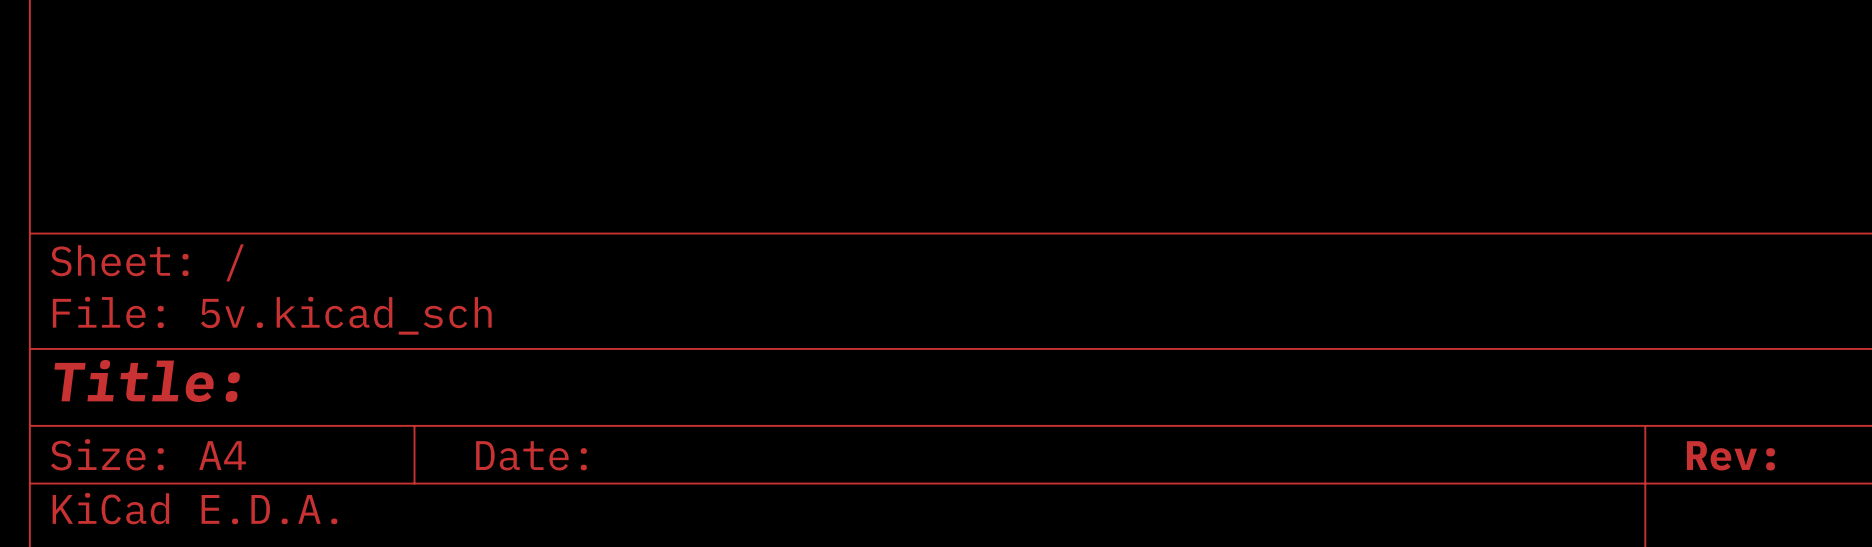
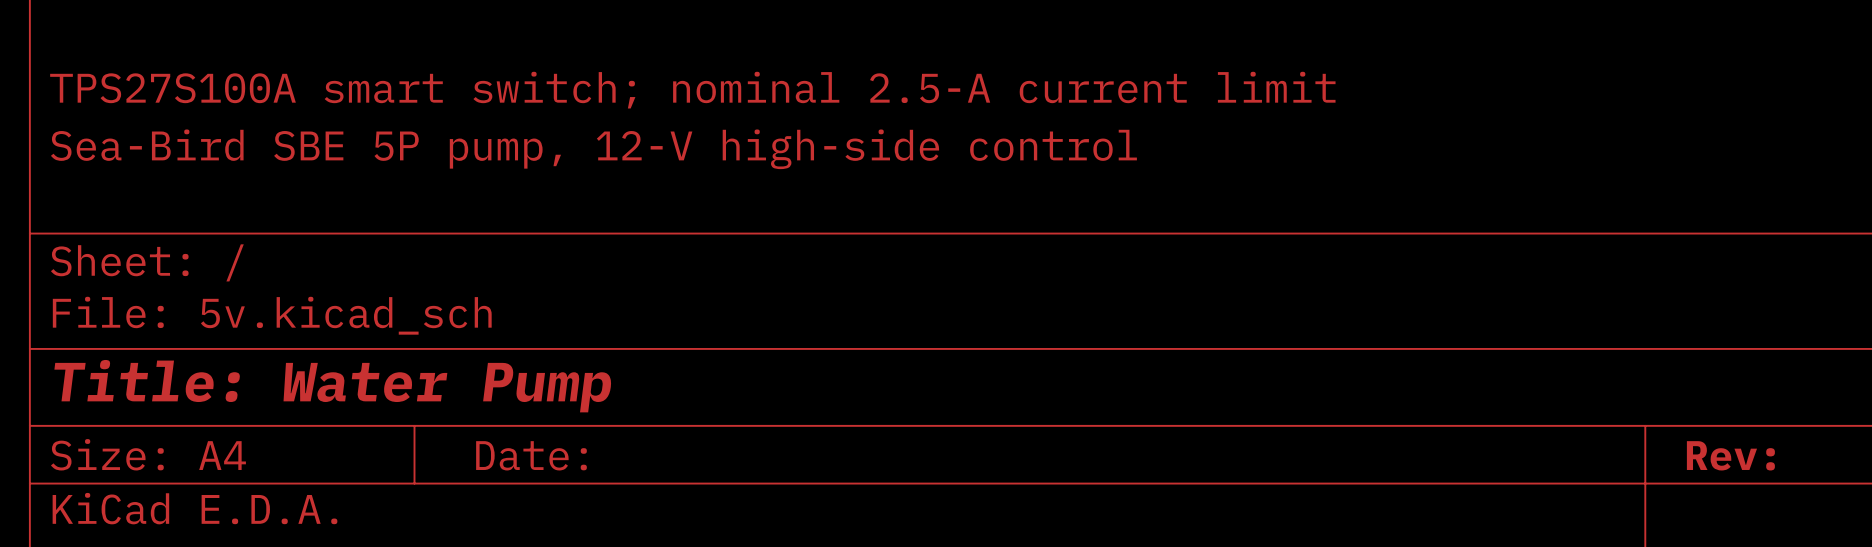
title block: none -> TPS27S100A smart switch; nominal 2.5-A current limit (692, 90)
title block: none -> Sea-Bird SBE 5P pump, 12-V high-side control (593, 149)
title block: Title: (147, 380) -> Title: Water Pump (332, 386)

